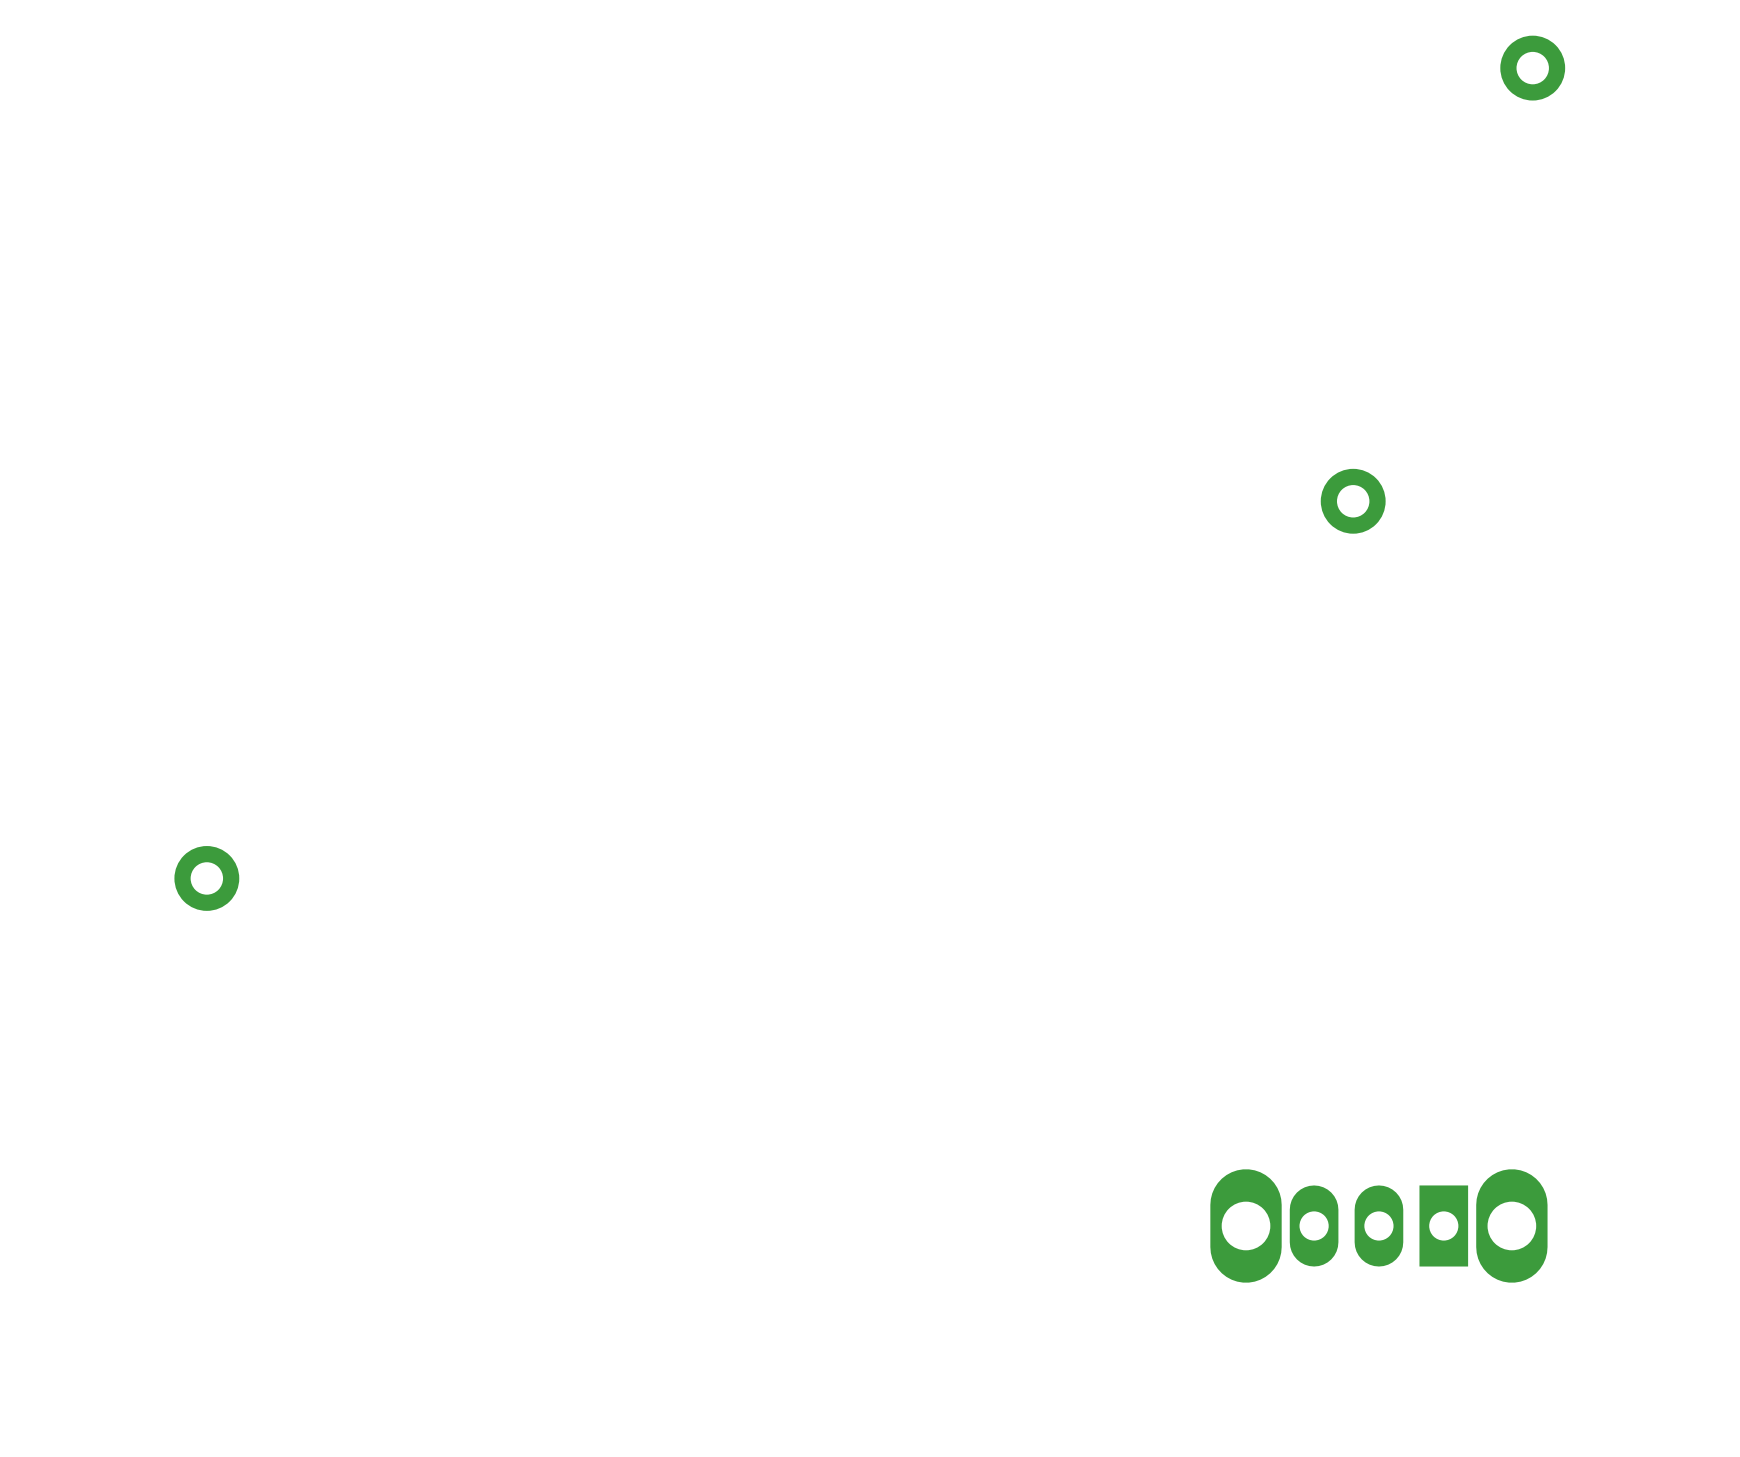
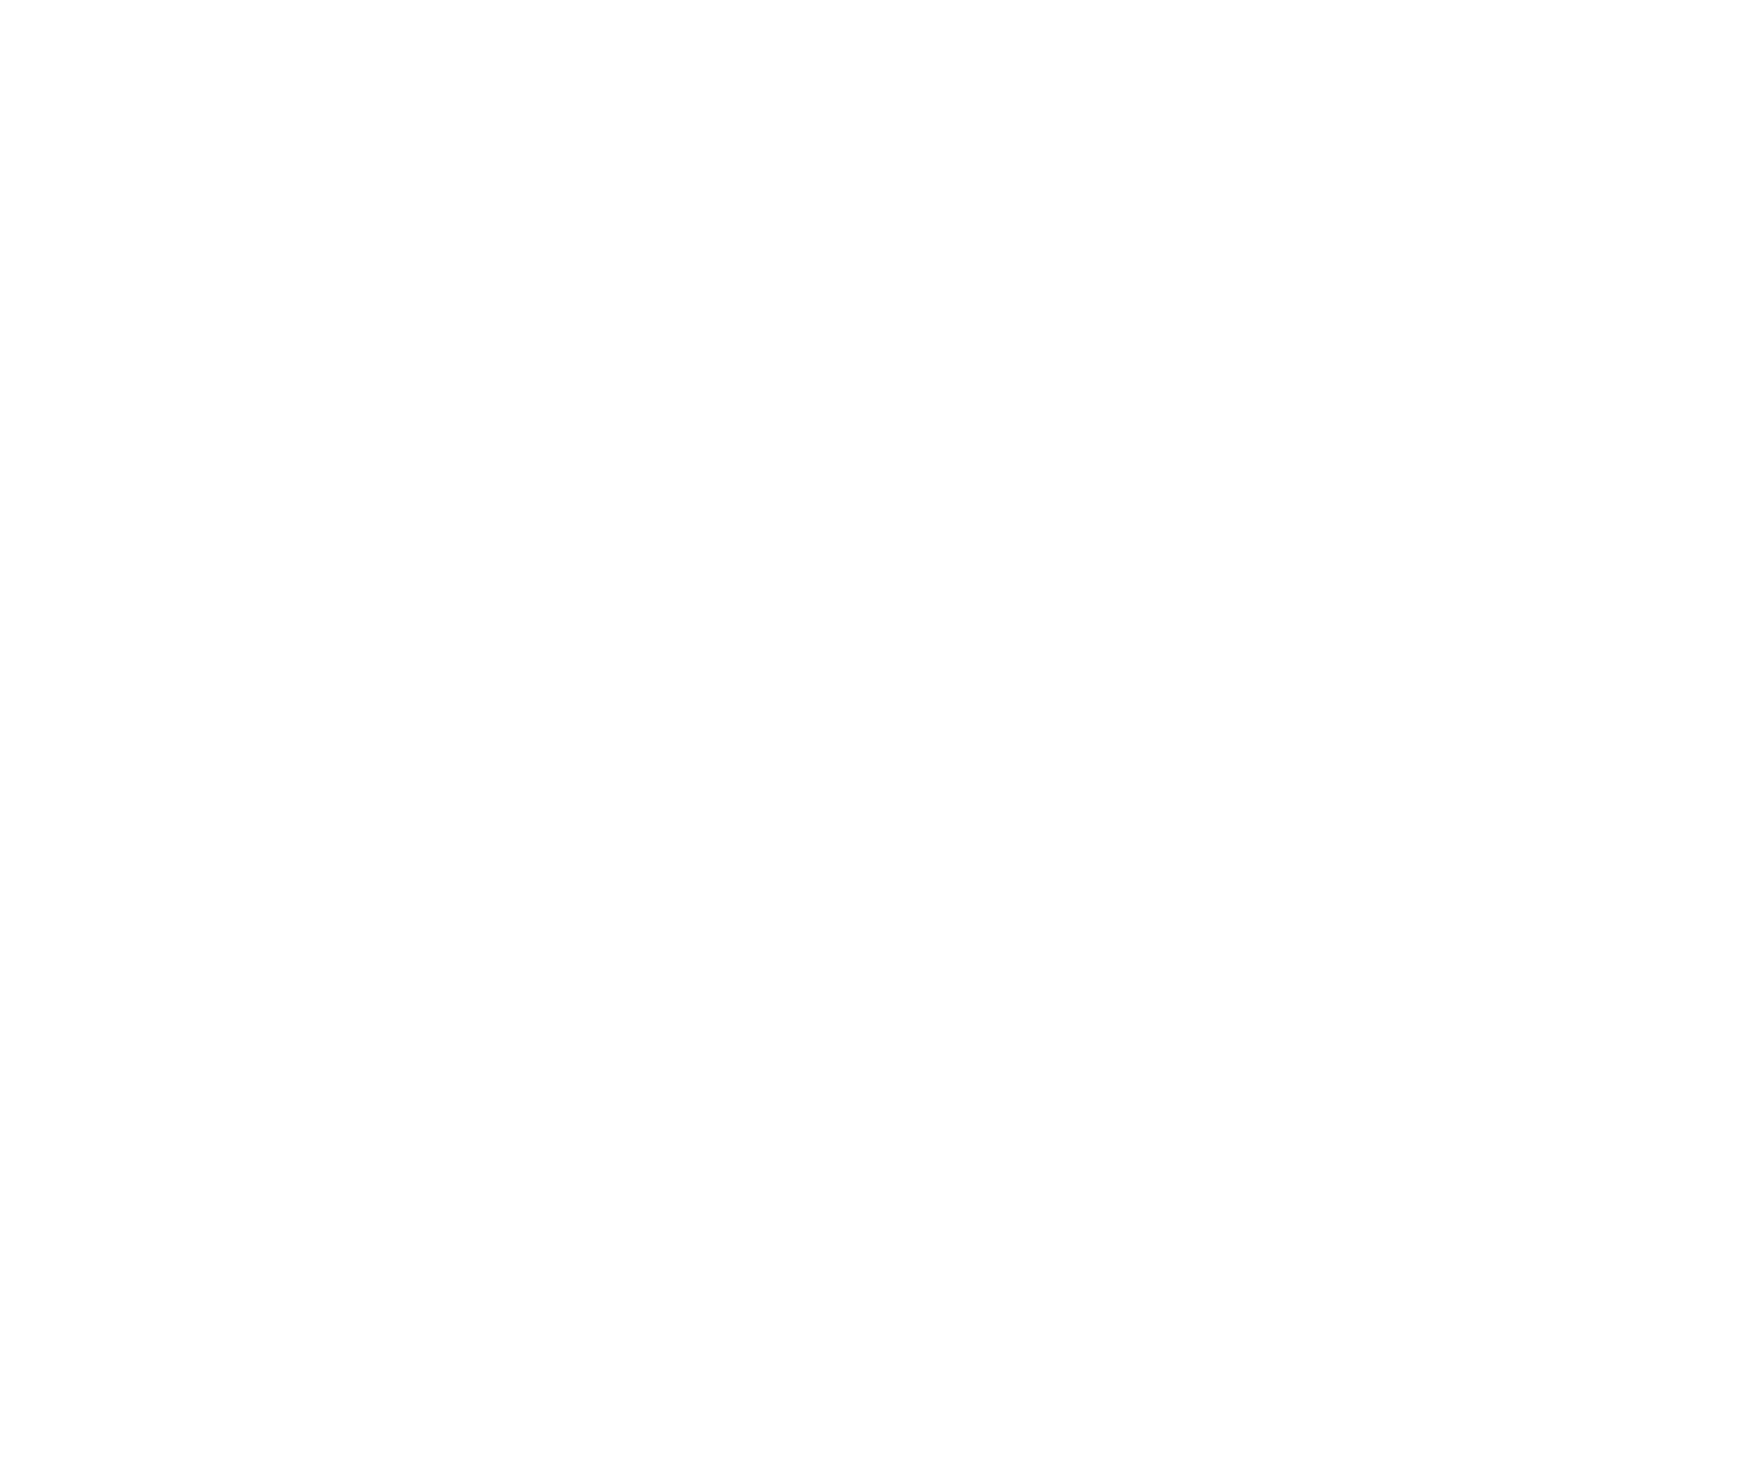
part: (1532, 68) -> none
part: (1353, 501) -> none
part: (206, 878) -> none
part: (1378, 1225) -> none

